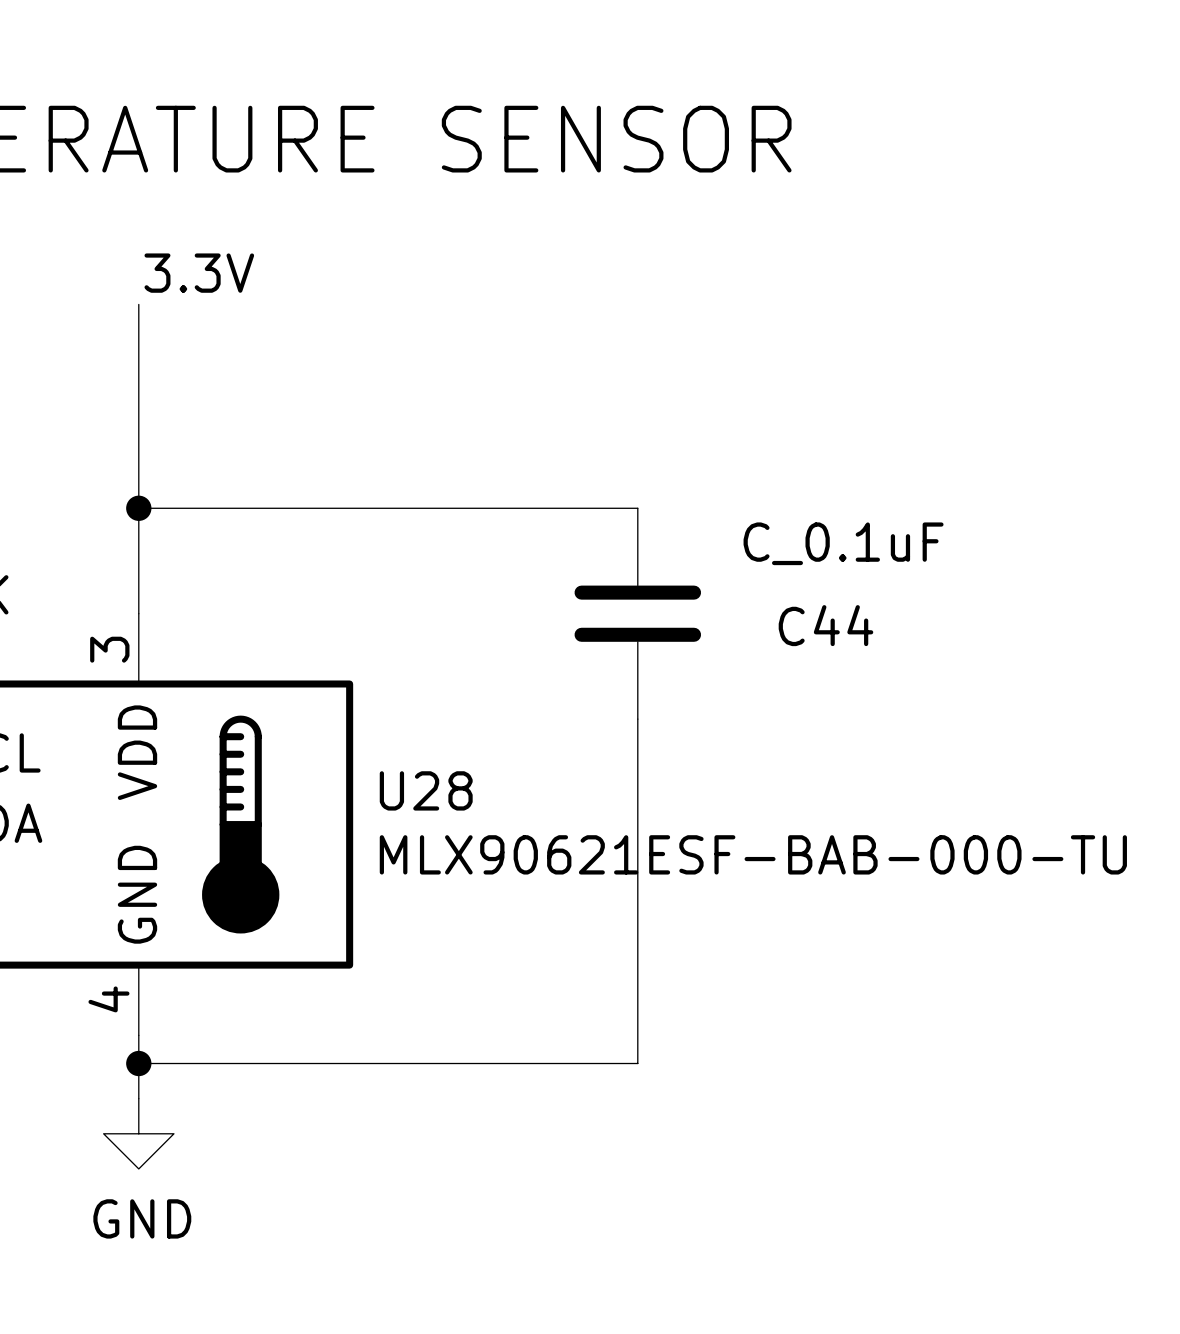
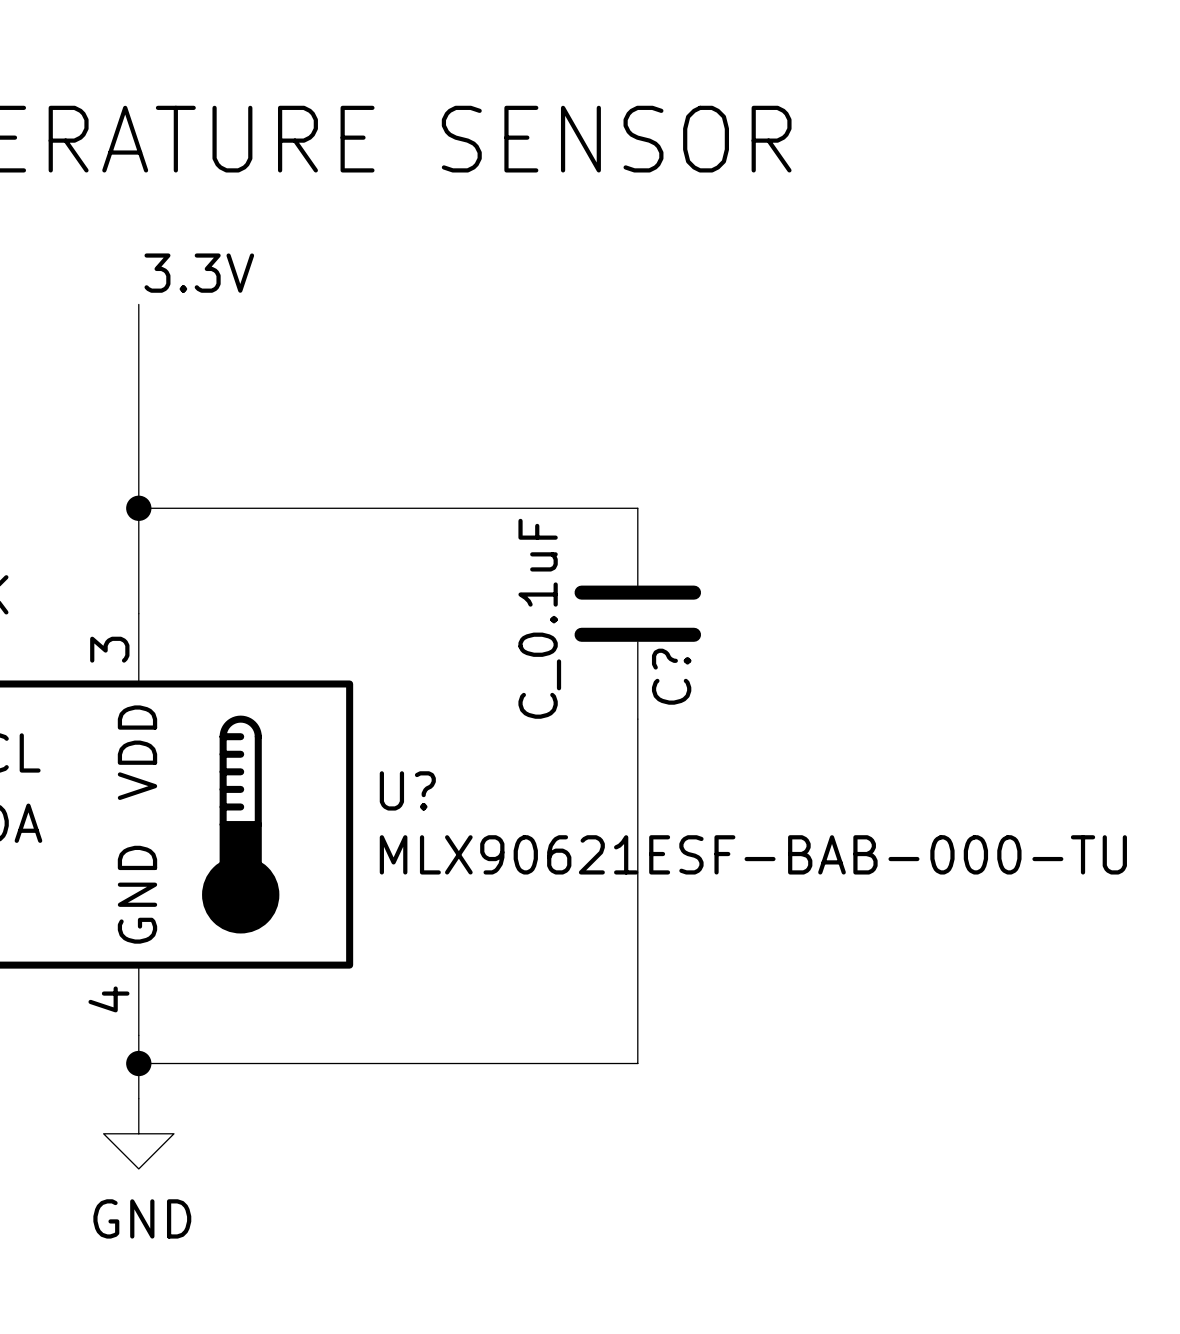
C44 value rotation: 0° (843, 543) -> 90° counterclockwise (539, 618)
C44 value position: C_0.1uF (843, 543) -> C_0.1uF (539, 618)
C44 name: C44 (825, 625) -> C? (671, 676)
U28 name: U28 (426, 790) -> U? (407, 790)

